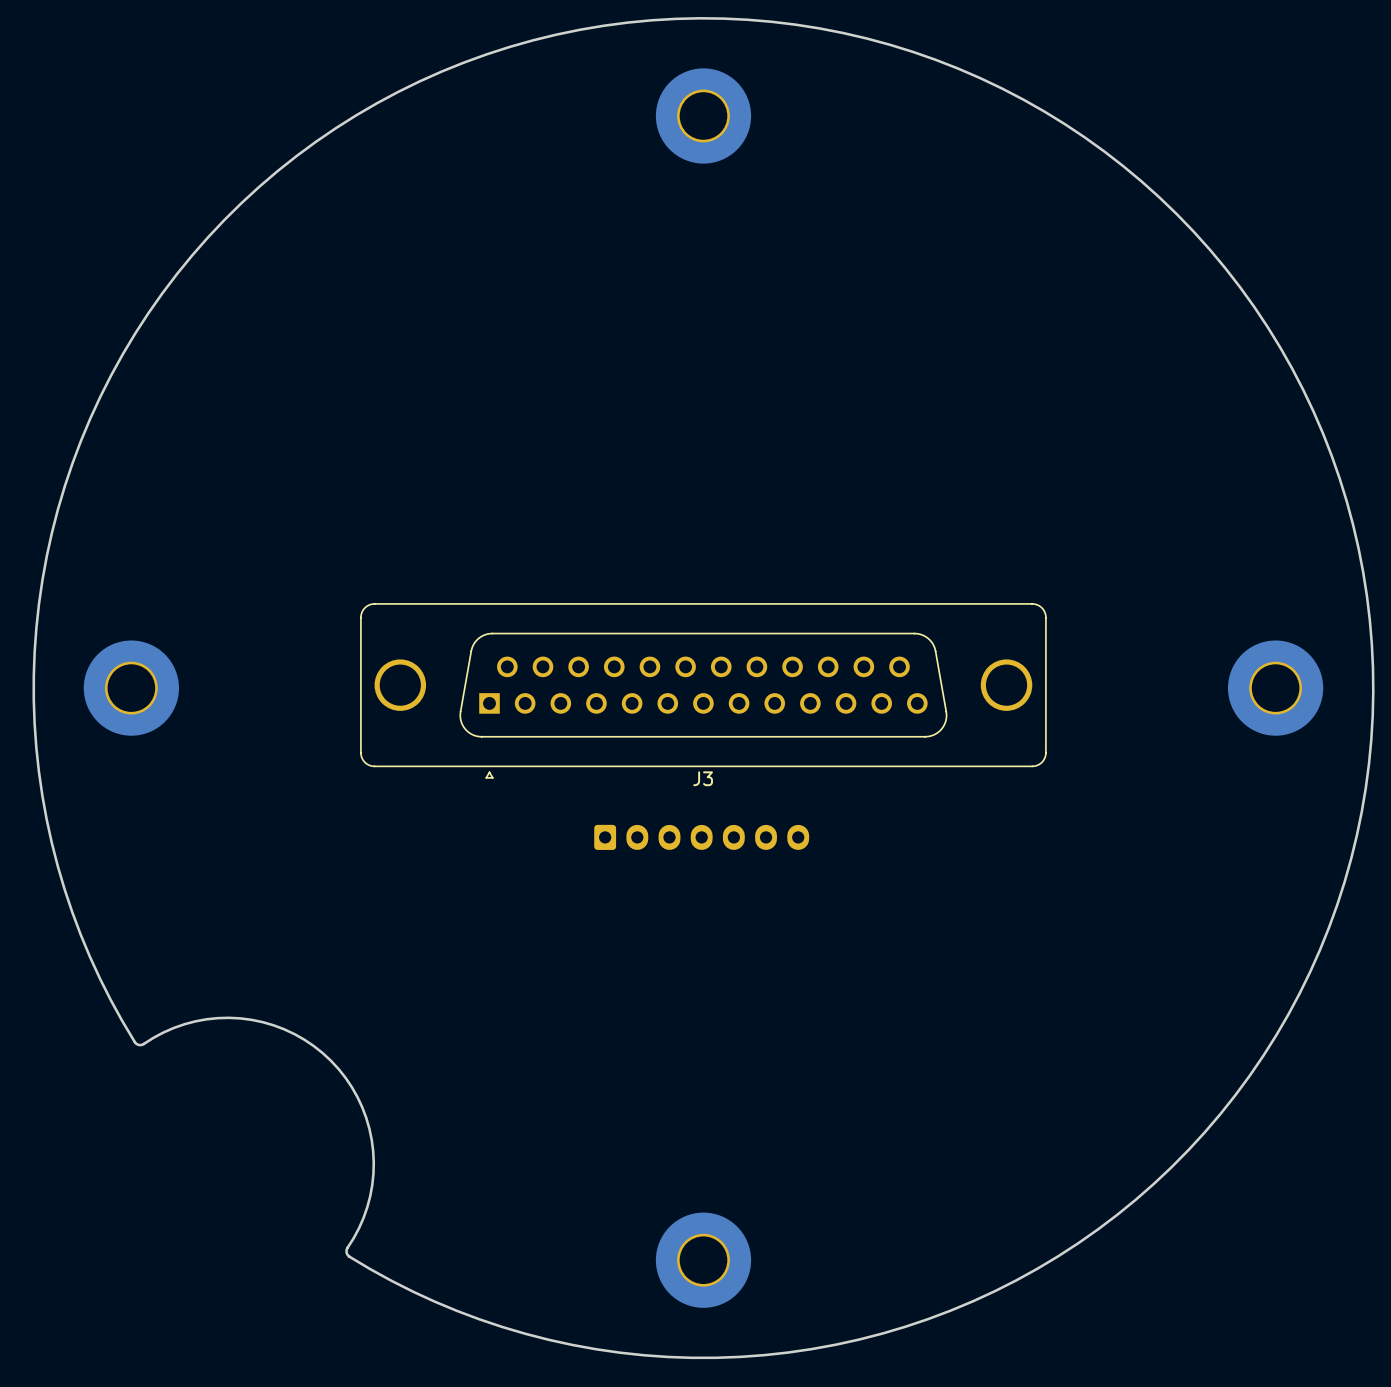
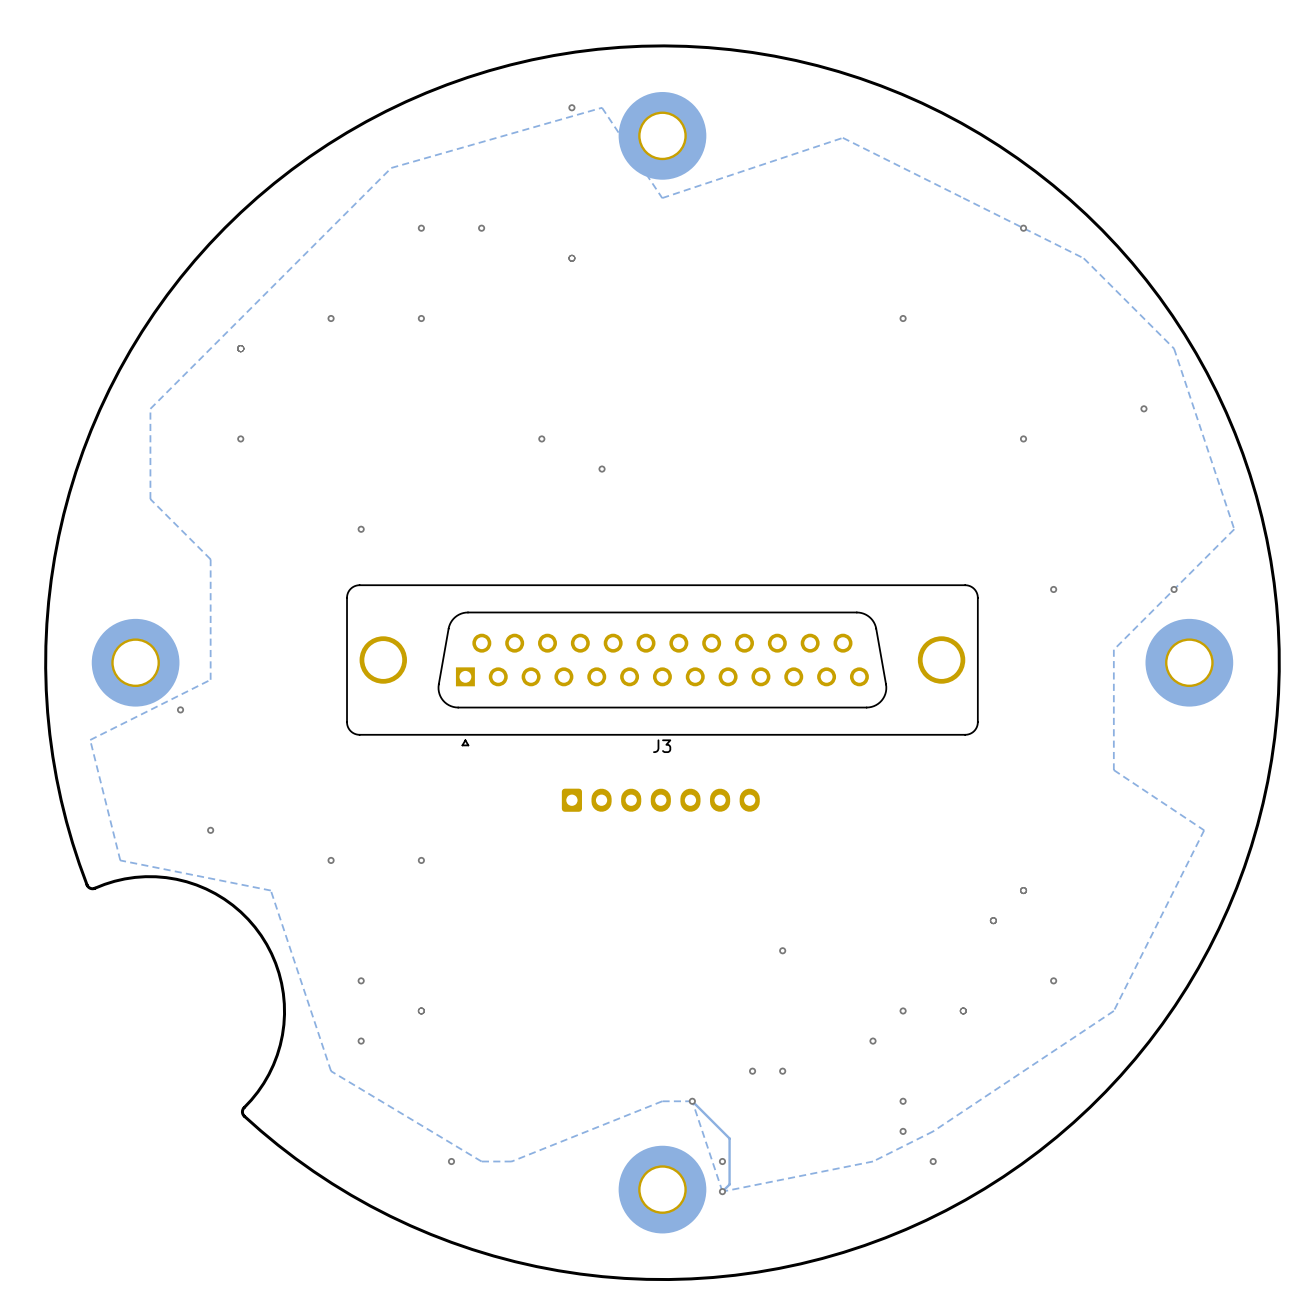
via: none -> (571, 107)
zone outline: none -> (602, 107) (391, 167) (150, 408) (150, 499) (210, 559) (210, 679) (90, 740) (120, 860) (270, 890) (331, 1071) (481, 1161) (511, 1161) (662, 1101) (692, 1101) (722, 1191) (872, 1161) (933, 1131) (1113, 1010) (1204, 830) (1113, 770) (1113, 649) (1234, 529) (1174, 348) (1083, 258) (842, 137) (662, 198) (602, 107)
via: none -> (421, 228)
via: none -> (481, 228)
via: none -> (1023, 228)
via: none -> (571, 258)
via: none -> (331, 318)
via: none -> (421, 318)
via: none -> (903, 318)
via: none -> (240, 348)
via: none -> (1143, 408)
via: none -> (240, 438)
via: none -> (541, 438)
via: none -> (1023, 438)
via: none -> (602, 469)
via: none -> (361, 529)
via: none -> (1053, 589)
via: none -> (1174, 589)
via: none -> (180, 709)
via: none -> (210, 830)
via: none -> (331, 860)
via: none -> (421, 860)
via: none -> (1023, 890)
via: none -> (993, 920)
via: none -> (782, 950)
via: none -> (361, 980)
via: none -> (1053, 980)
board edge: (134, 1042) (100, 978) (72, 912) (57, 866) (42, 795) (36, 747) (33, 675) (36, 627) (46, 556) (58, 509) (81, 440) (111, 375) (148, 313) (192, 255) (241, 203) (277, 171) (335, 128) (398, 91) (464, 62) (509, 46) (579, 29) (627, 22) (699, 18) (771, 21) (843, 33) (889, 44) (958, 68) (1023, 99) (1084, 137) (1123, 166) (1177, 214) (1225, 268) (1267, 326) (1292, 368) (1323, 433) (1346, 501) (1363, 572) (1369, 619) (1373, 691) (1368, 764) (1356, 835) (1337, 904) (1320, 949) (1288, 1014) (1249, 1075) (1204, 1132) (1154, 1183) (1117, 1214) (1058, 1256) (1016, 1280) (950, 1310) (882, 1333) (811, 1349) (740, 1356) (667, 1356) (596, 1349) (548, 1339) (502, 1327) (434, 1301) (391, 1280) (347, 1255) (346, 1248) (359, 1228) (370, 1196) (373, 1162) (371, 1139) (362, 1107) (351, 1087) (330, 1060) (313, 1045) (294, 1034) (273, 1025) (251, 1019) (229, 1017) (195, 1021) (163, 1032) (142, 1044) (134, 1042) -> (87, 884) (93, 888) (114, 881) (145, 876) (176, 879) (196, 885) (215, 893) (232, 905) (248, 919) (266, 944) (275, 963) (283, 993) (284, 1014) (280, 1045) (273, 1064) (257, 1091) (243, 1108) (243, 1114) (278, 1145) (313, 1171) (370, 1206) (410, 1225) (472, 1249) (536, 1266) (580, 1274) (646, 1279) (713, 1277) (779, 1268) (822, 1258) (885, 1237) (946, 1210) (1003, 1176) (1039, 1150) (1089, 1107) (1135, 1058) (1162, 1023) (1198, 967) (1228, 908) (1251, 846) (1267, 781) (1277, 715) (1279, 671) (1276, 604) (1266, 539) (1256, 496) (1234, 433) (1206, 372) (1172, 315) (1146, 280) (1102, 230) (1053, 185) (1017, 158) (961, 123) (901, 94) (839, 71) (796, 60) (730, 49) (686, 46) (619, 47) (575, 52) (510, 64) (446, 84) (385, 111) (328, 144) (291, 169) (240, 212) (209, 243) (167, 295) (130, 350) (99, 409) (75, 471) (58, 536) (51, 579) (45, 646) (47, 712) (56, 778) (66, 821) (87, 884)
via: none -> (421, 1010)
via: none -> (903, 1010)
via: none -> (963, 1010)
via: none -> (361, 1041)
via: none -> (872, 1041)
via: none -> (752, 1071)
via: none -> (782, 1071)
track: none -> (692, 1101) (729, 1138) (729, 1184) (722, 1191)
via: none -> (692, 1101)
via: none -> (903, 1101)
via: none -> (903, 1131)
via: none -> (451, 1161)
via: none -> (722, 1161)
via: none -> (933, 1161)
via: none -> (722, 1191)

